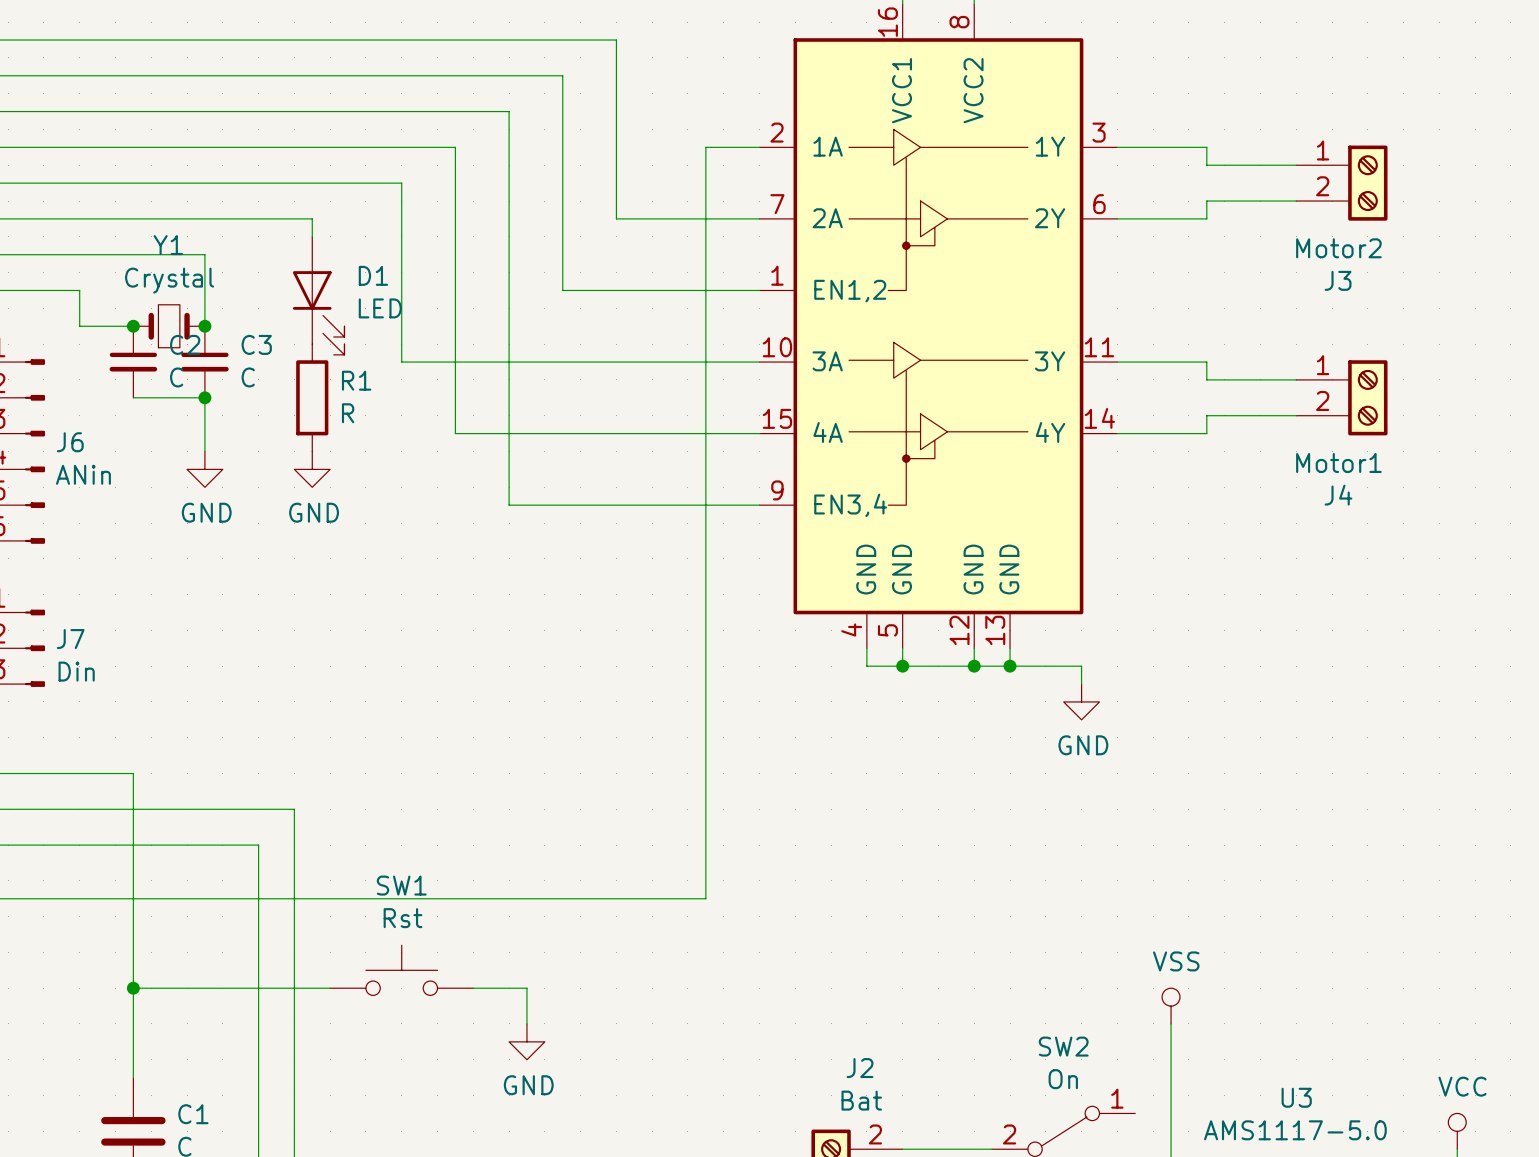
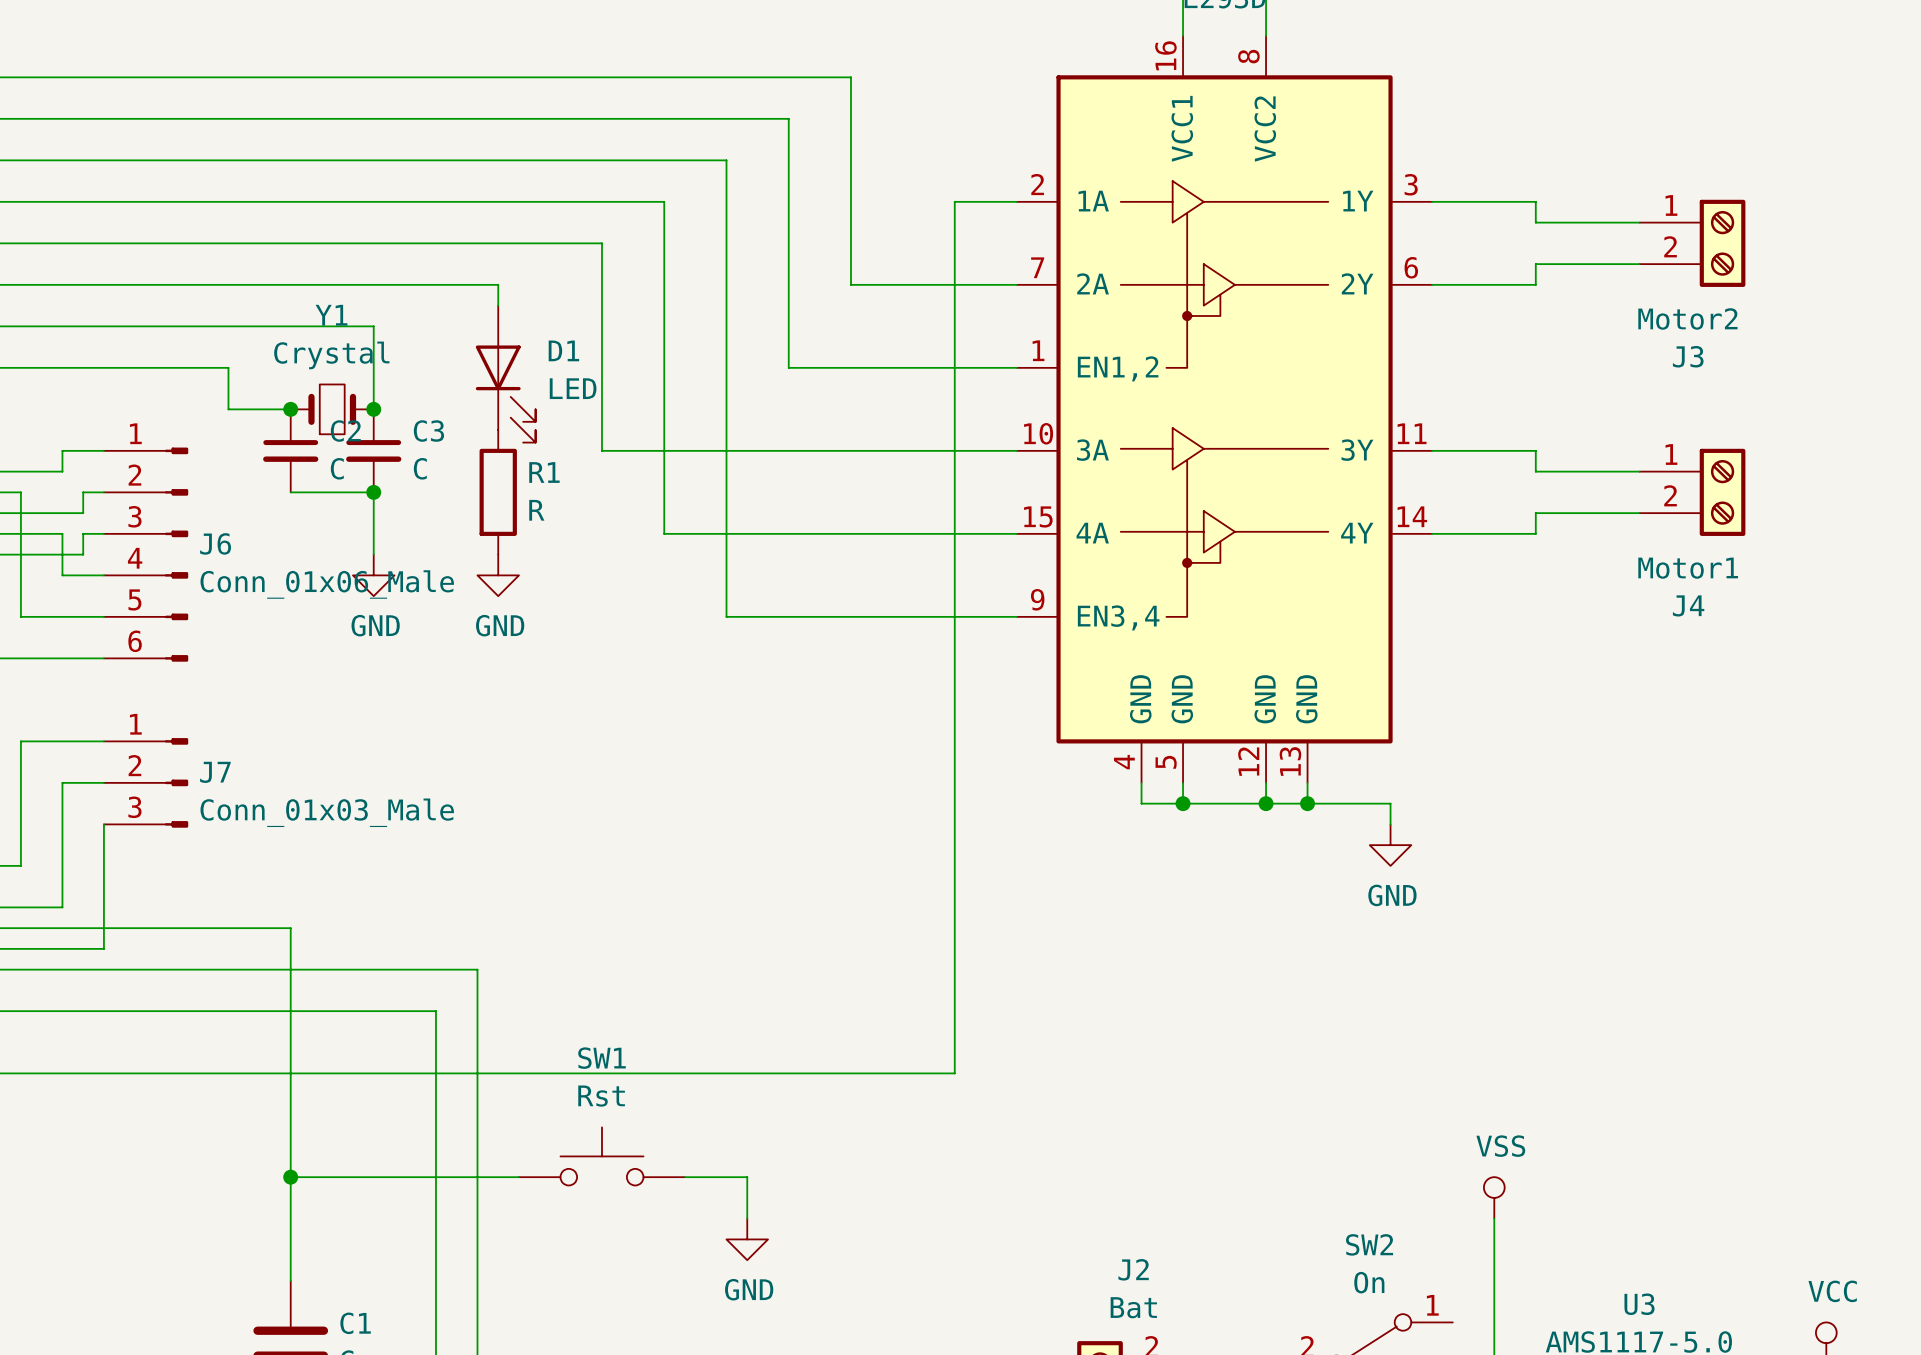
J6 value: ANin (83, 474) -> Conn_01x06_Male (327, 584)
J7 value: Din (76, 671) -> Conn_01x03_Male (327, 812)

